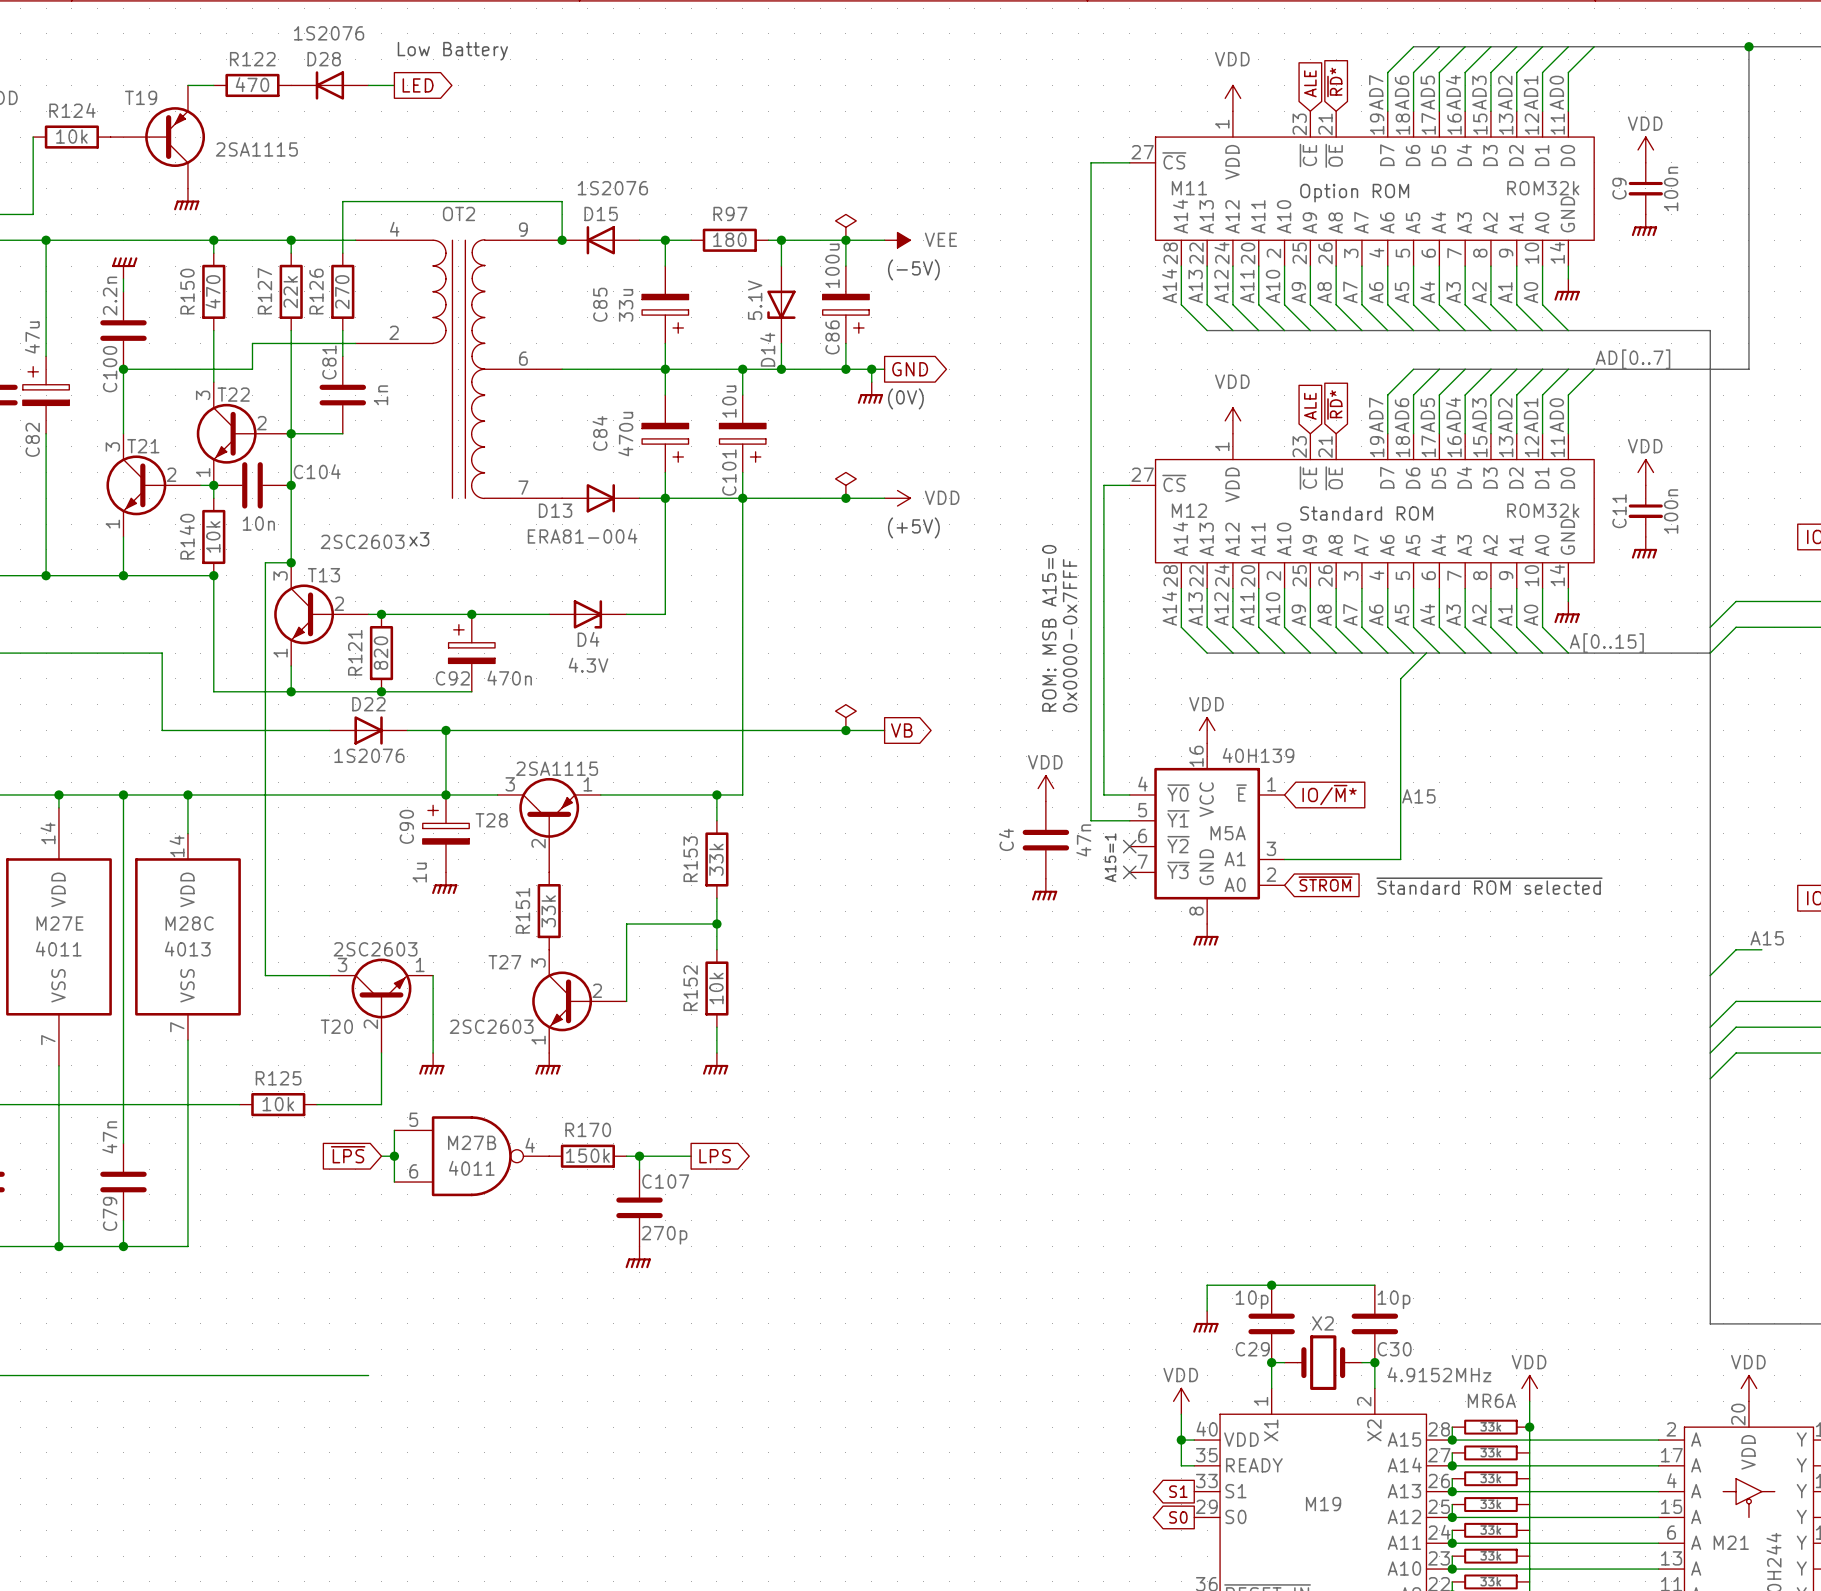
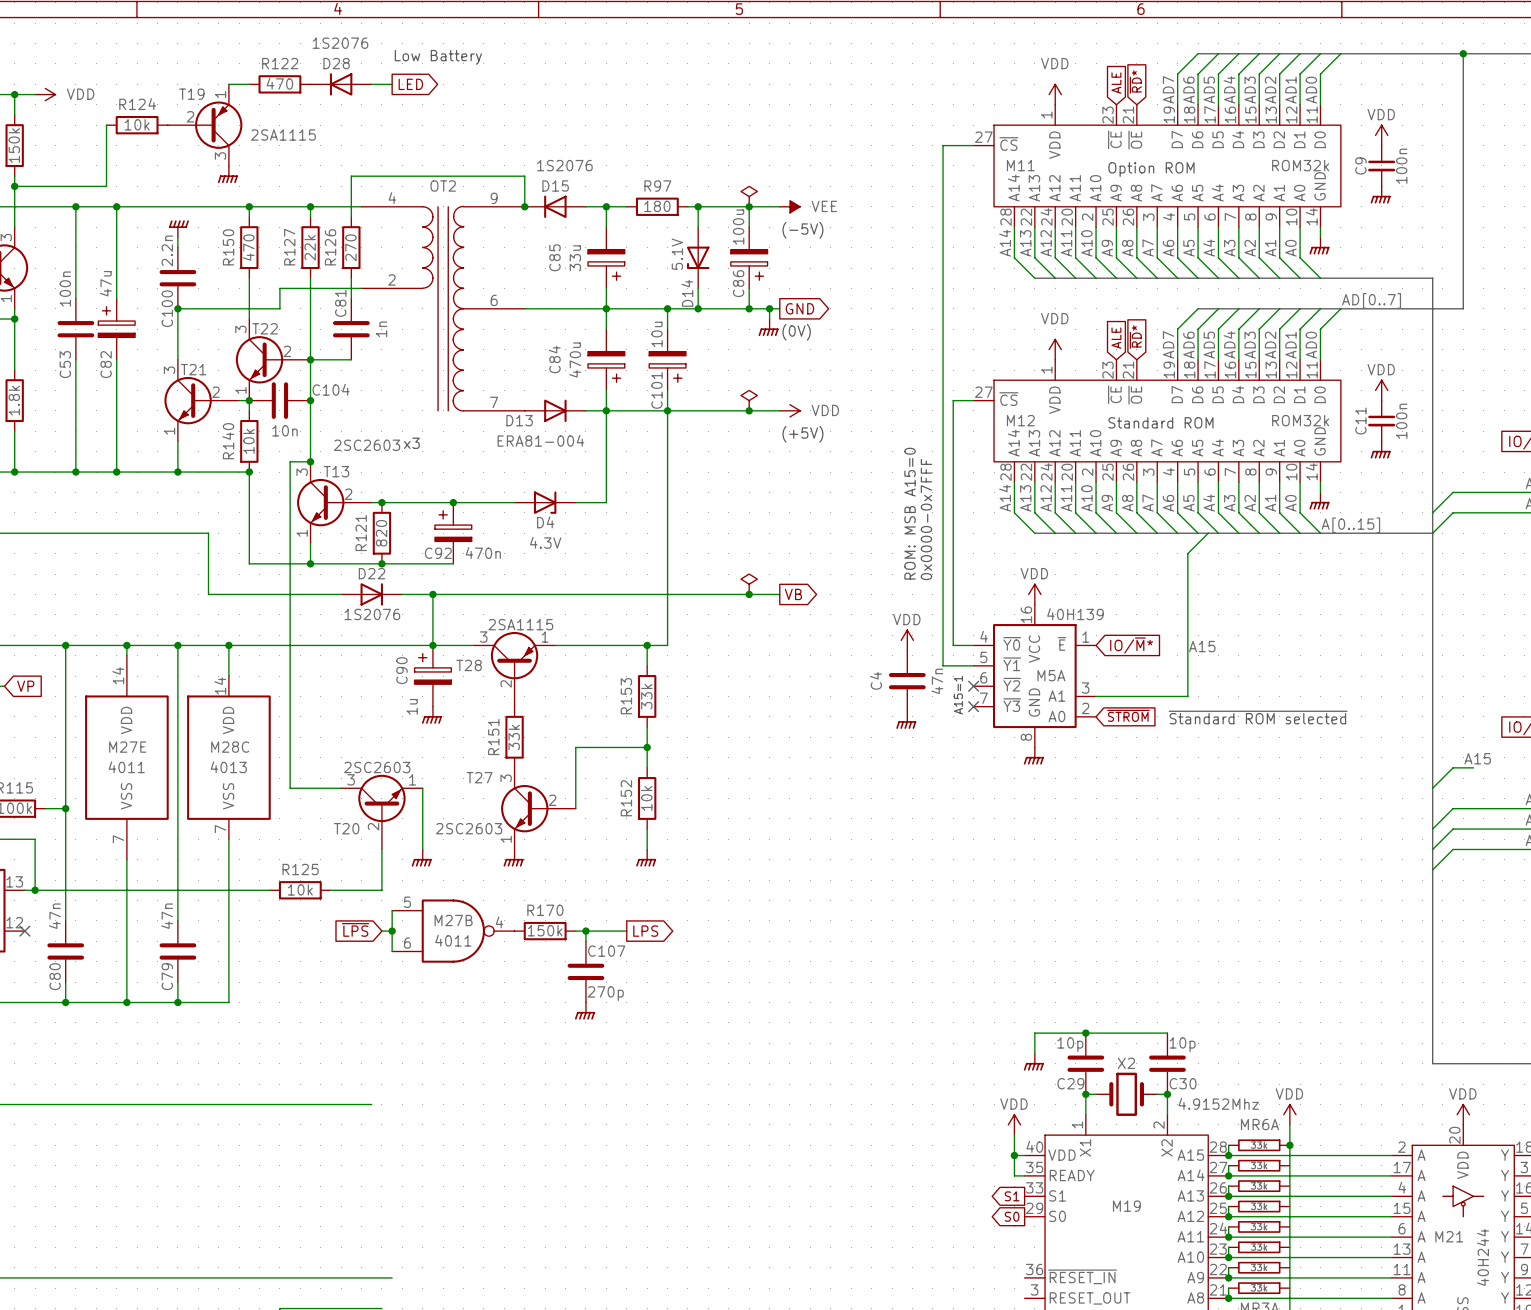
T19 pin number: none -> 1 (220, 94)
T19 pin number: none -> 2 (190, 116)
T19 pin number: none -> 3 (220, 156)
X2 value: 4.9152MHz (1439, 1374) -> 4.9152Mhz (1218, 1103)

